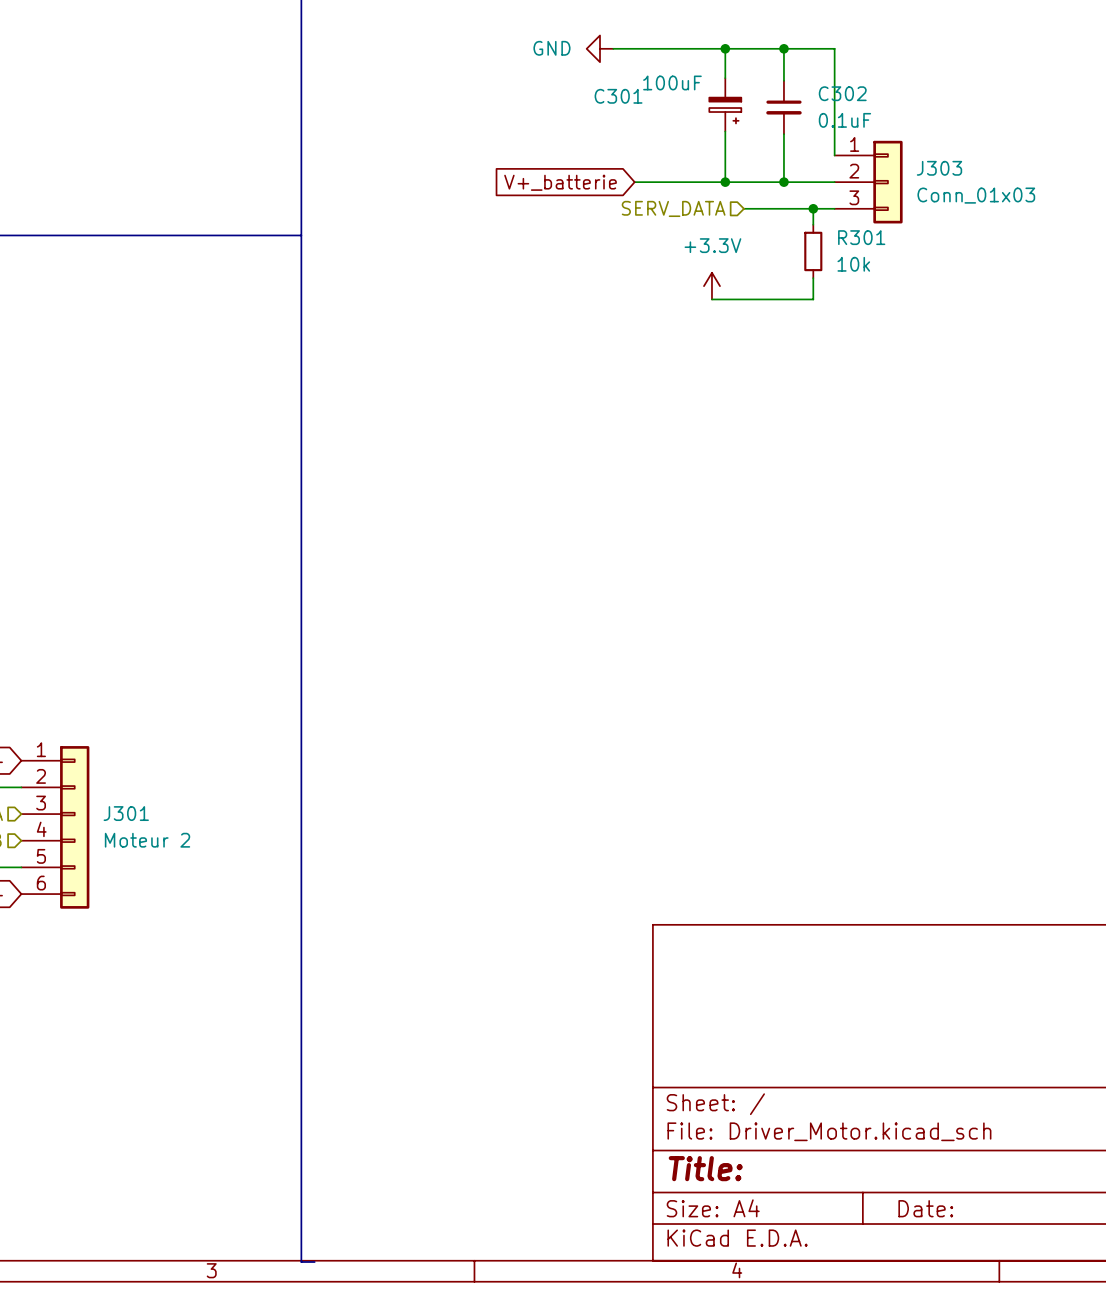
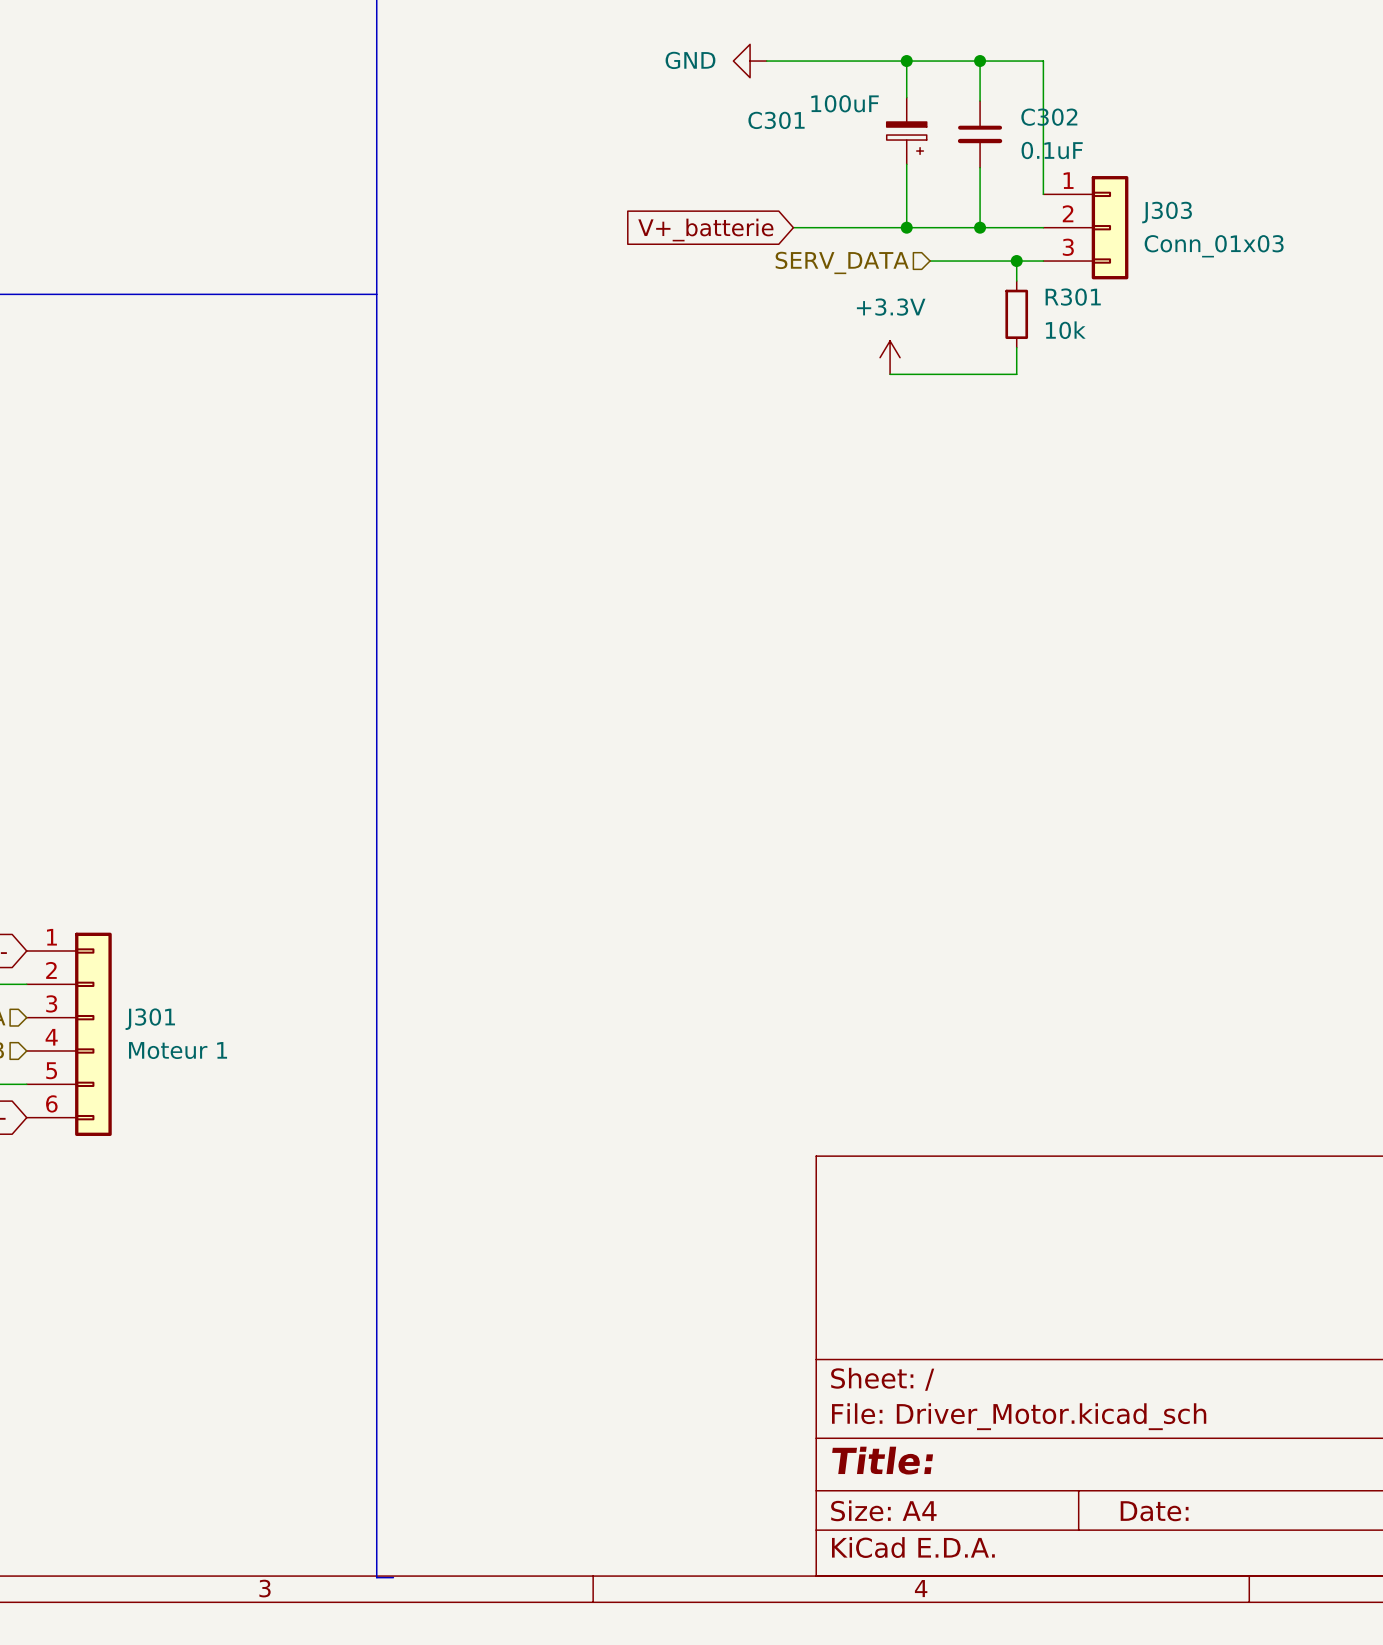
J301 value: Moteur 2 (147, 840) -> Moteur 1 (178, 1050)

